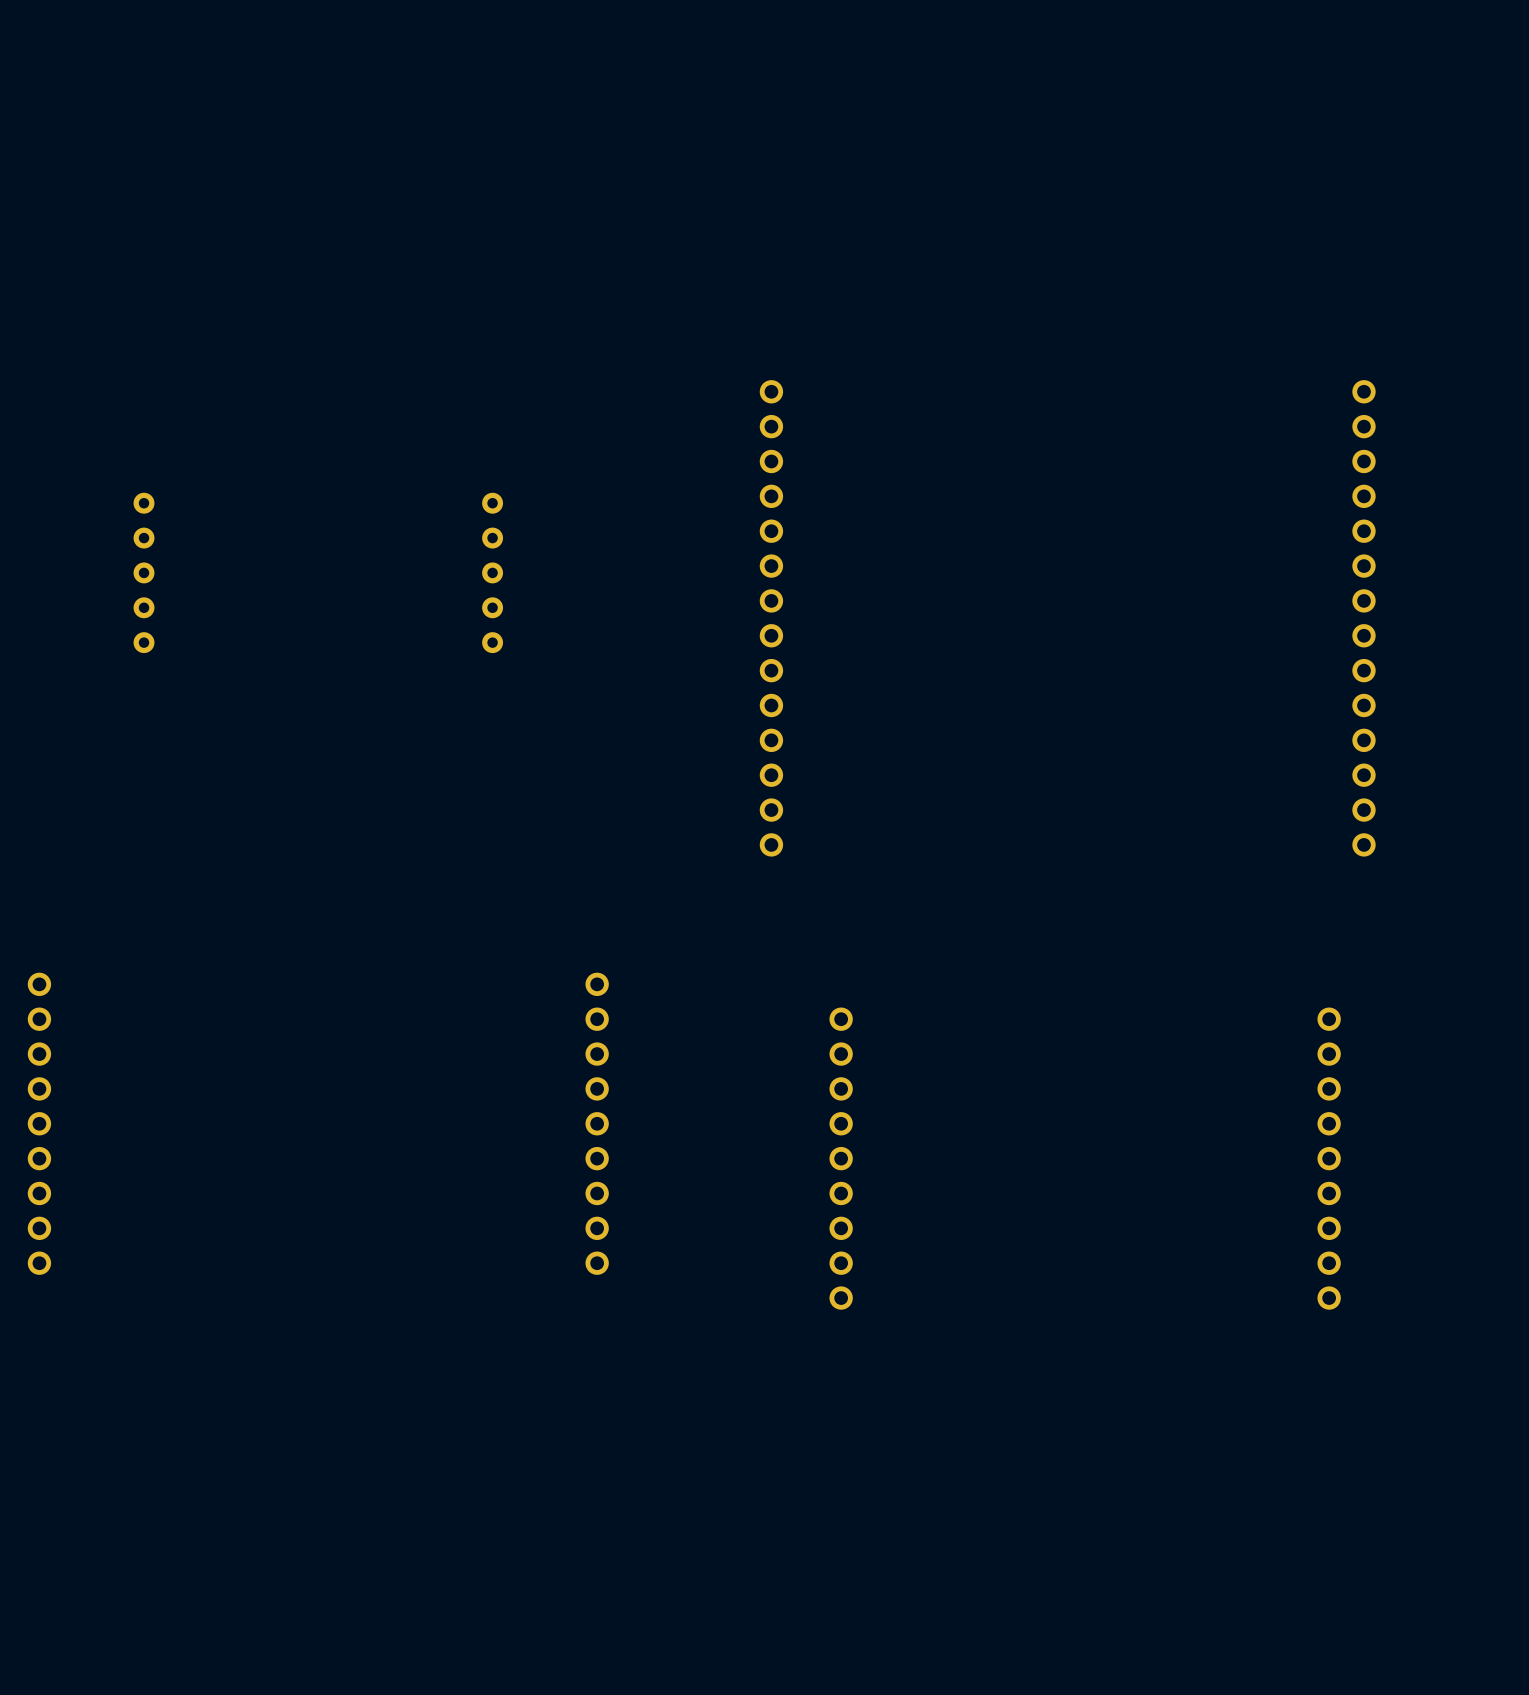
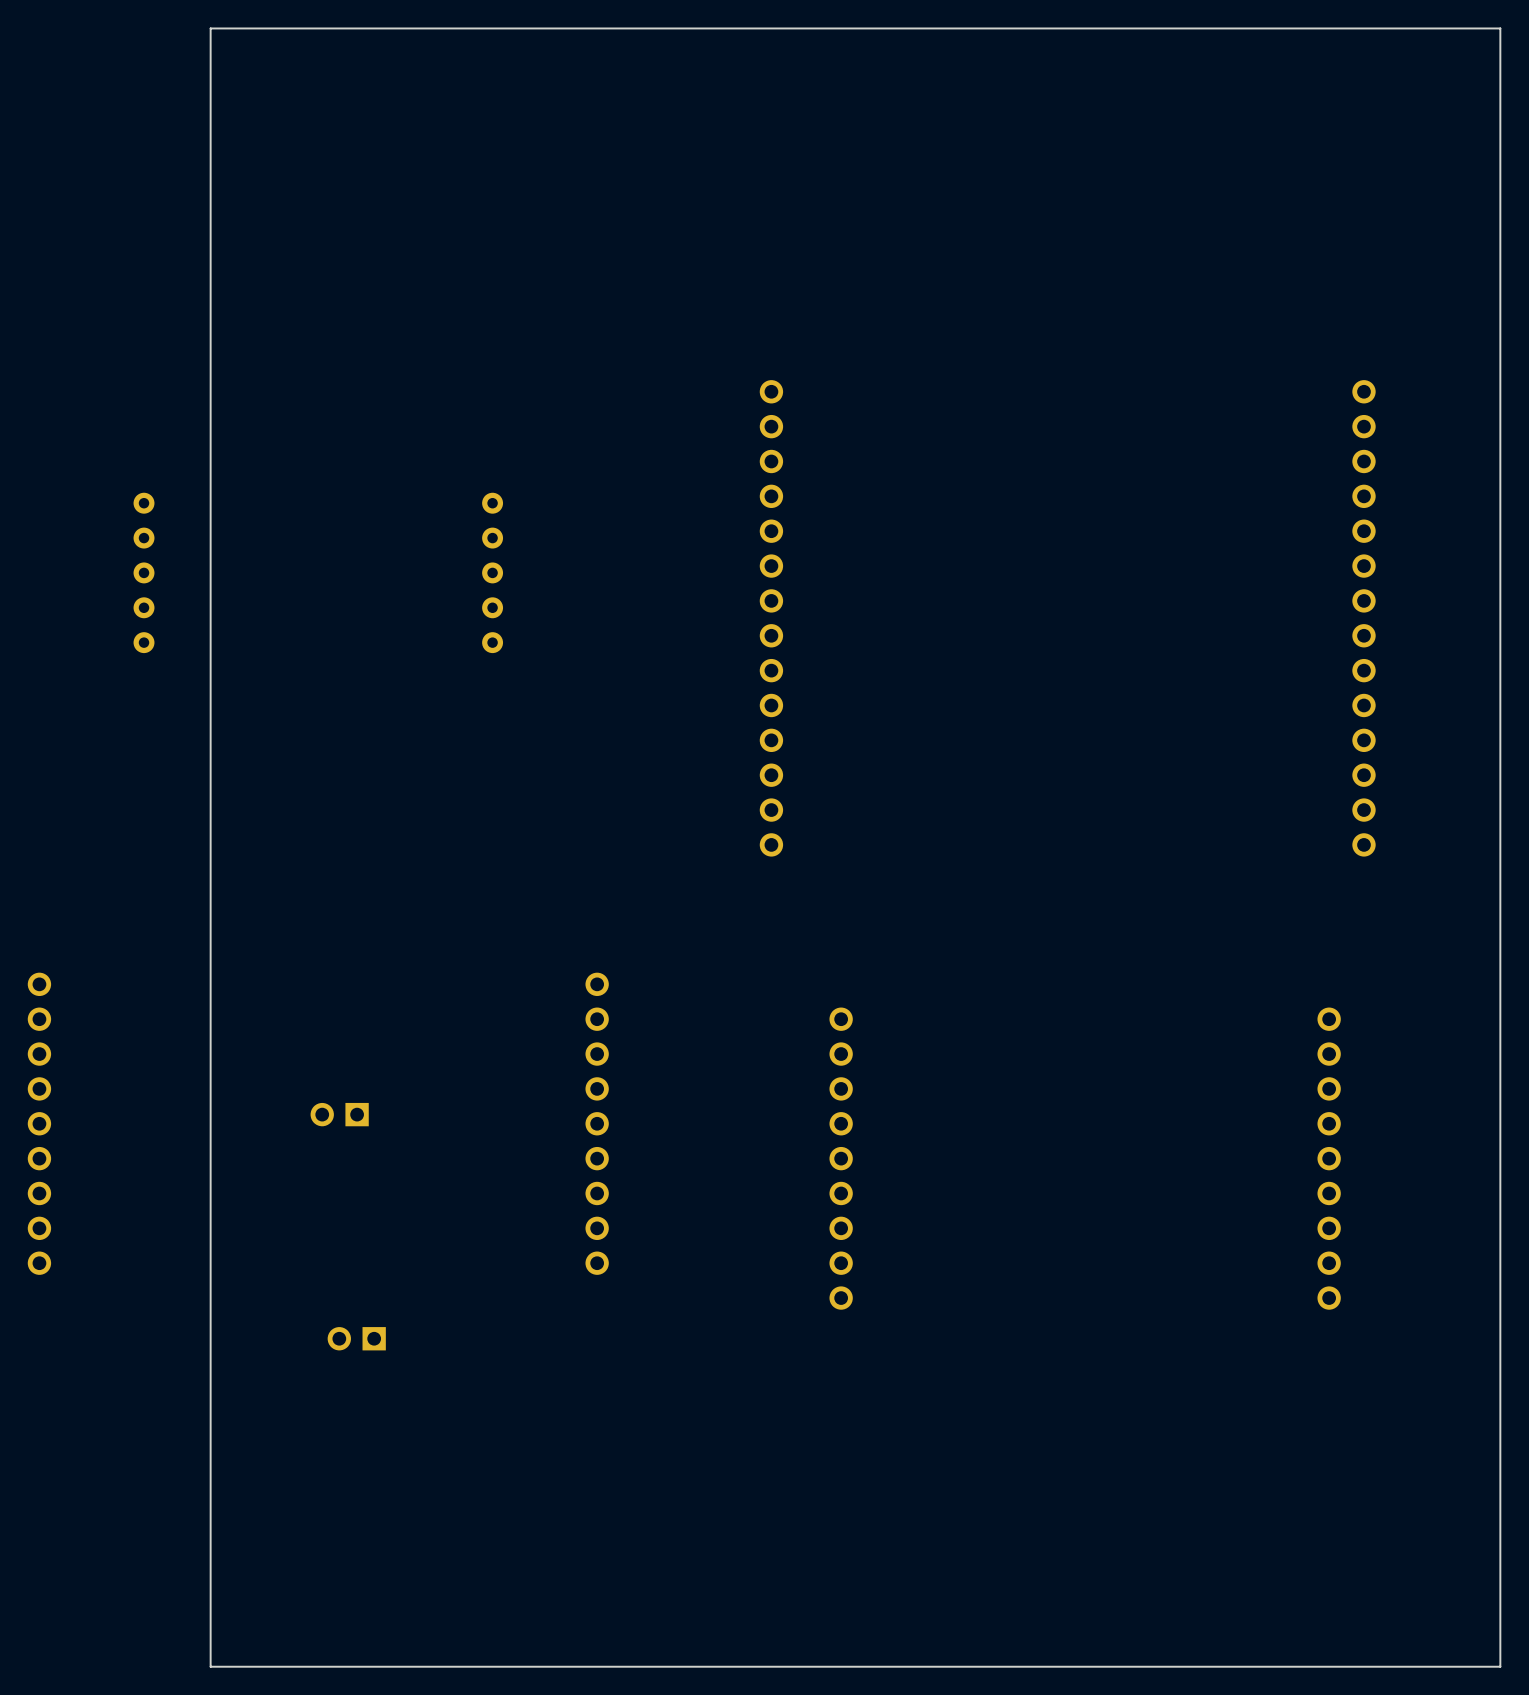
board edge: none -> (1500, 28) (210, 28) (210, 1666) (1500, 1666) (1500, 28)
part: none -> (339, 1114)
part: none -> (356, 1338)

